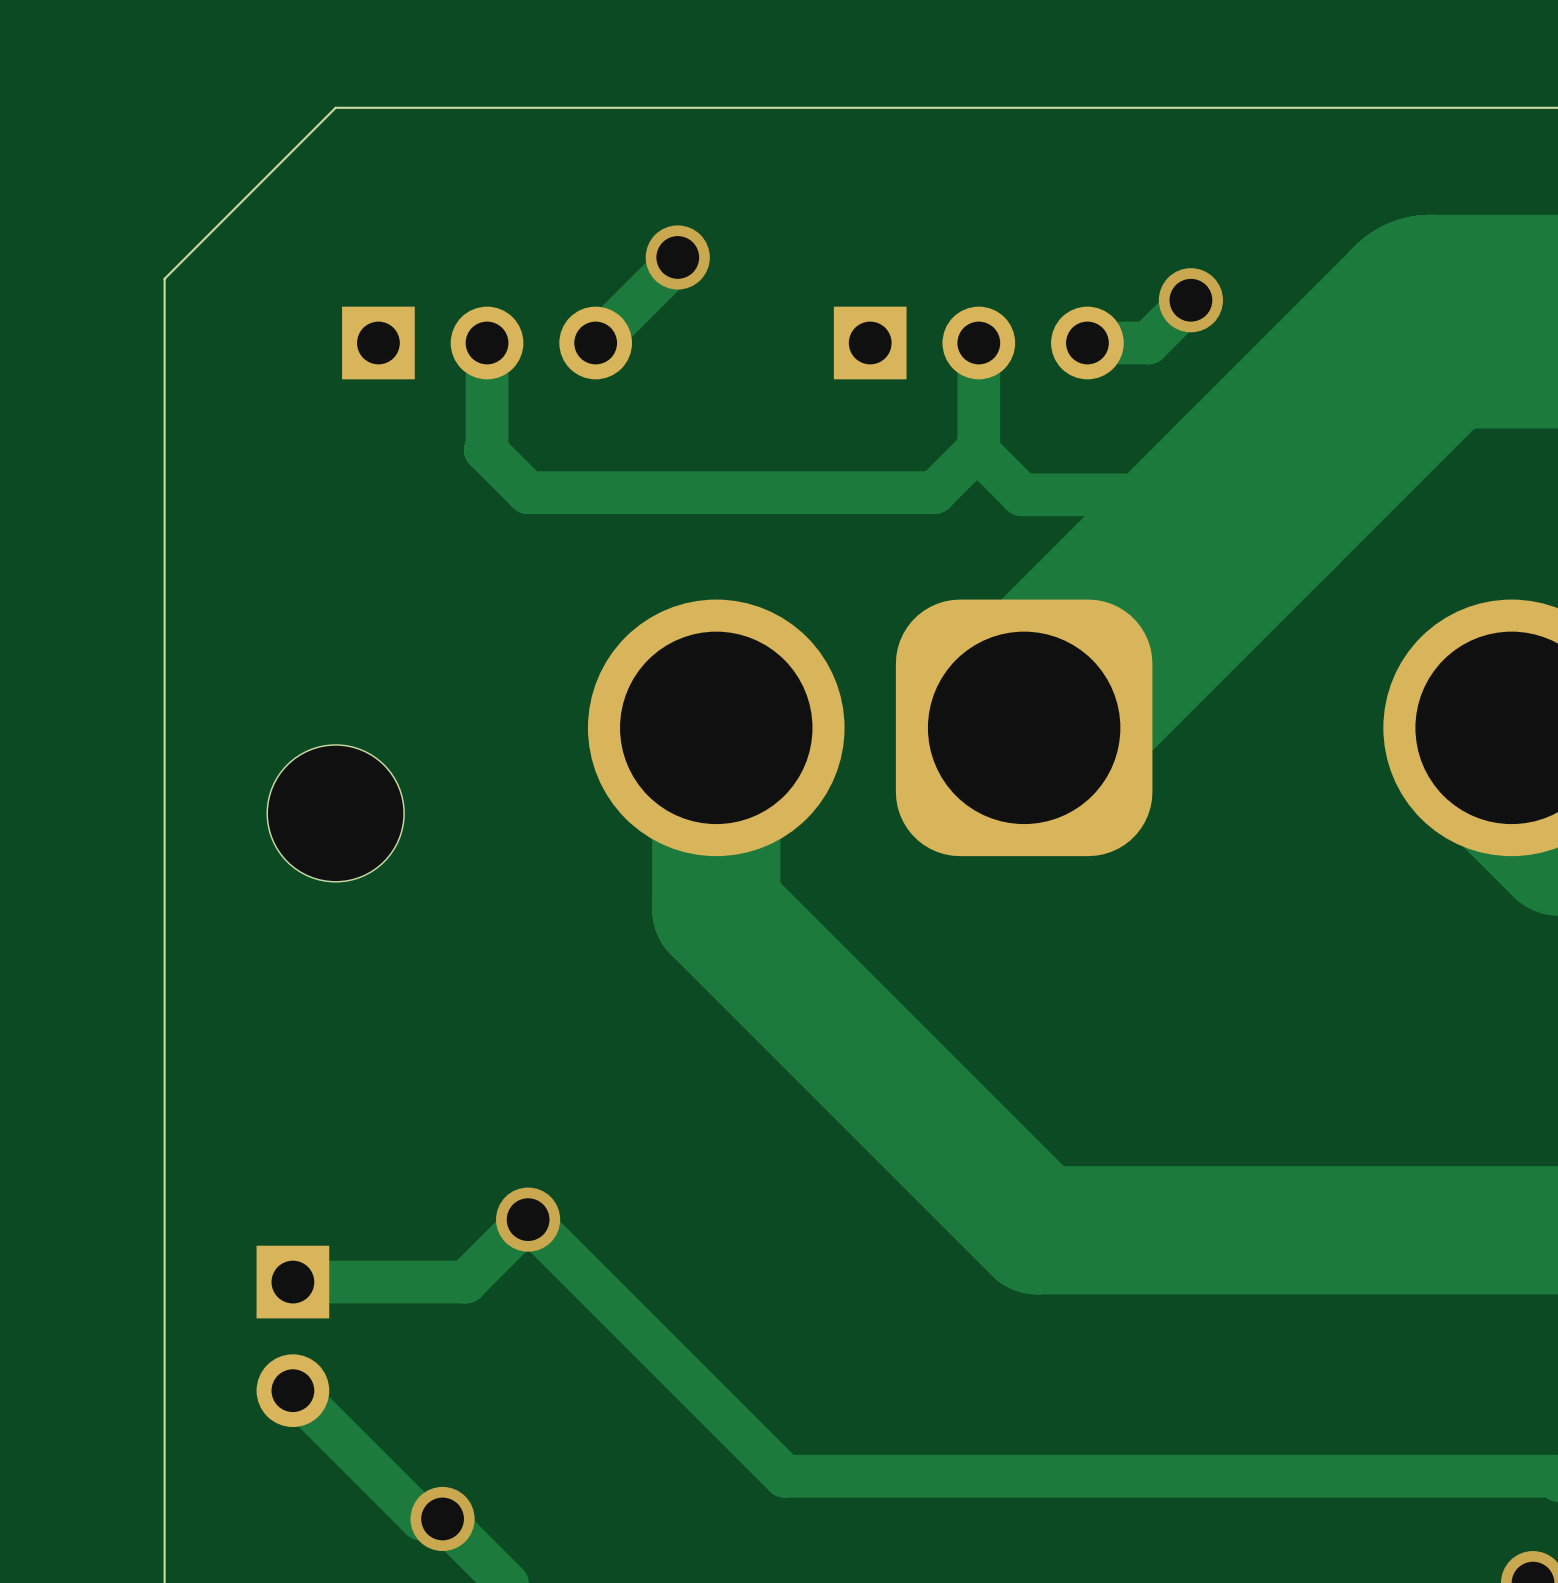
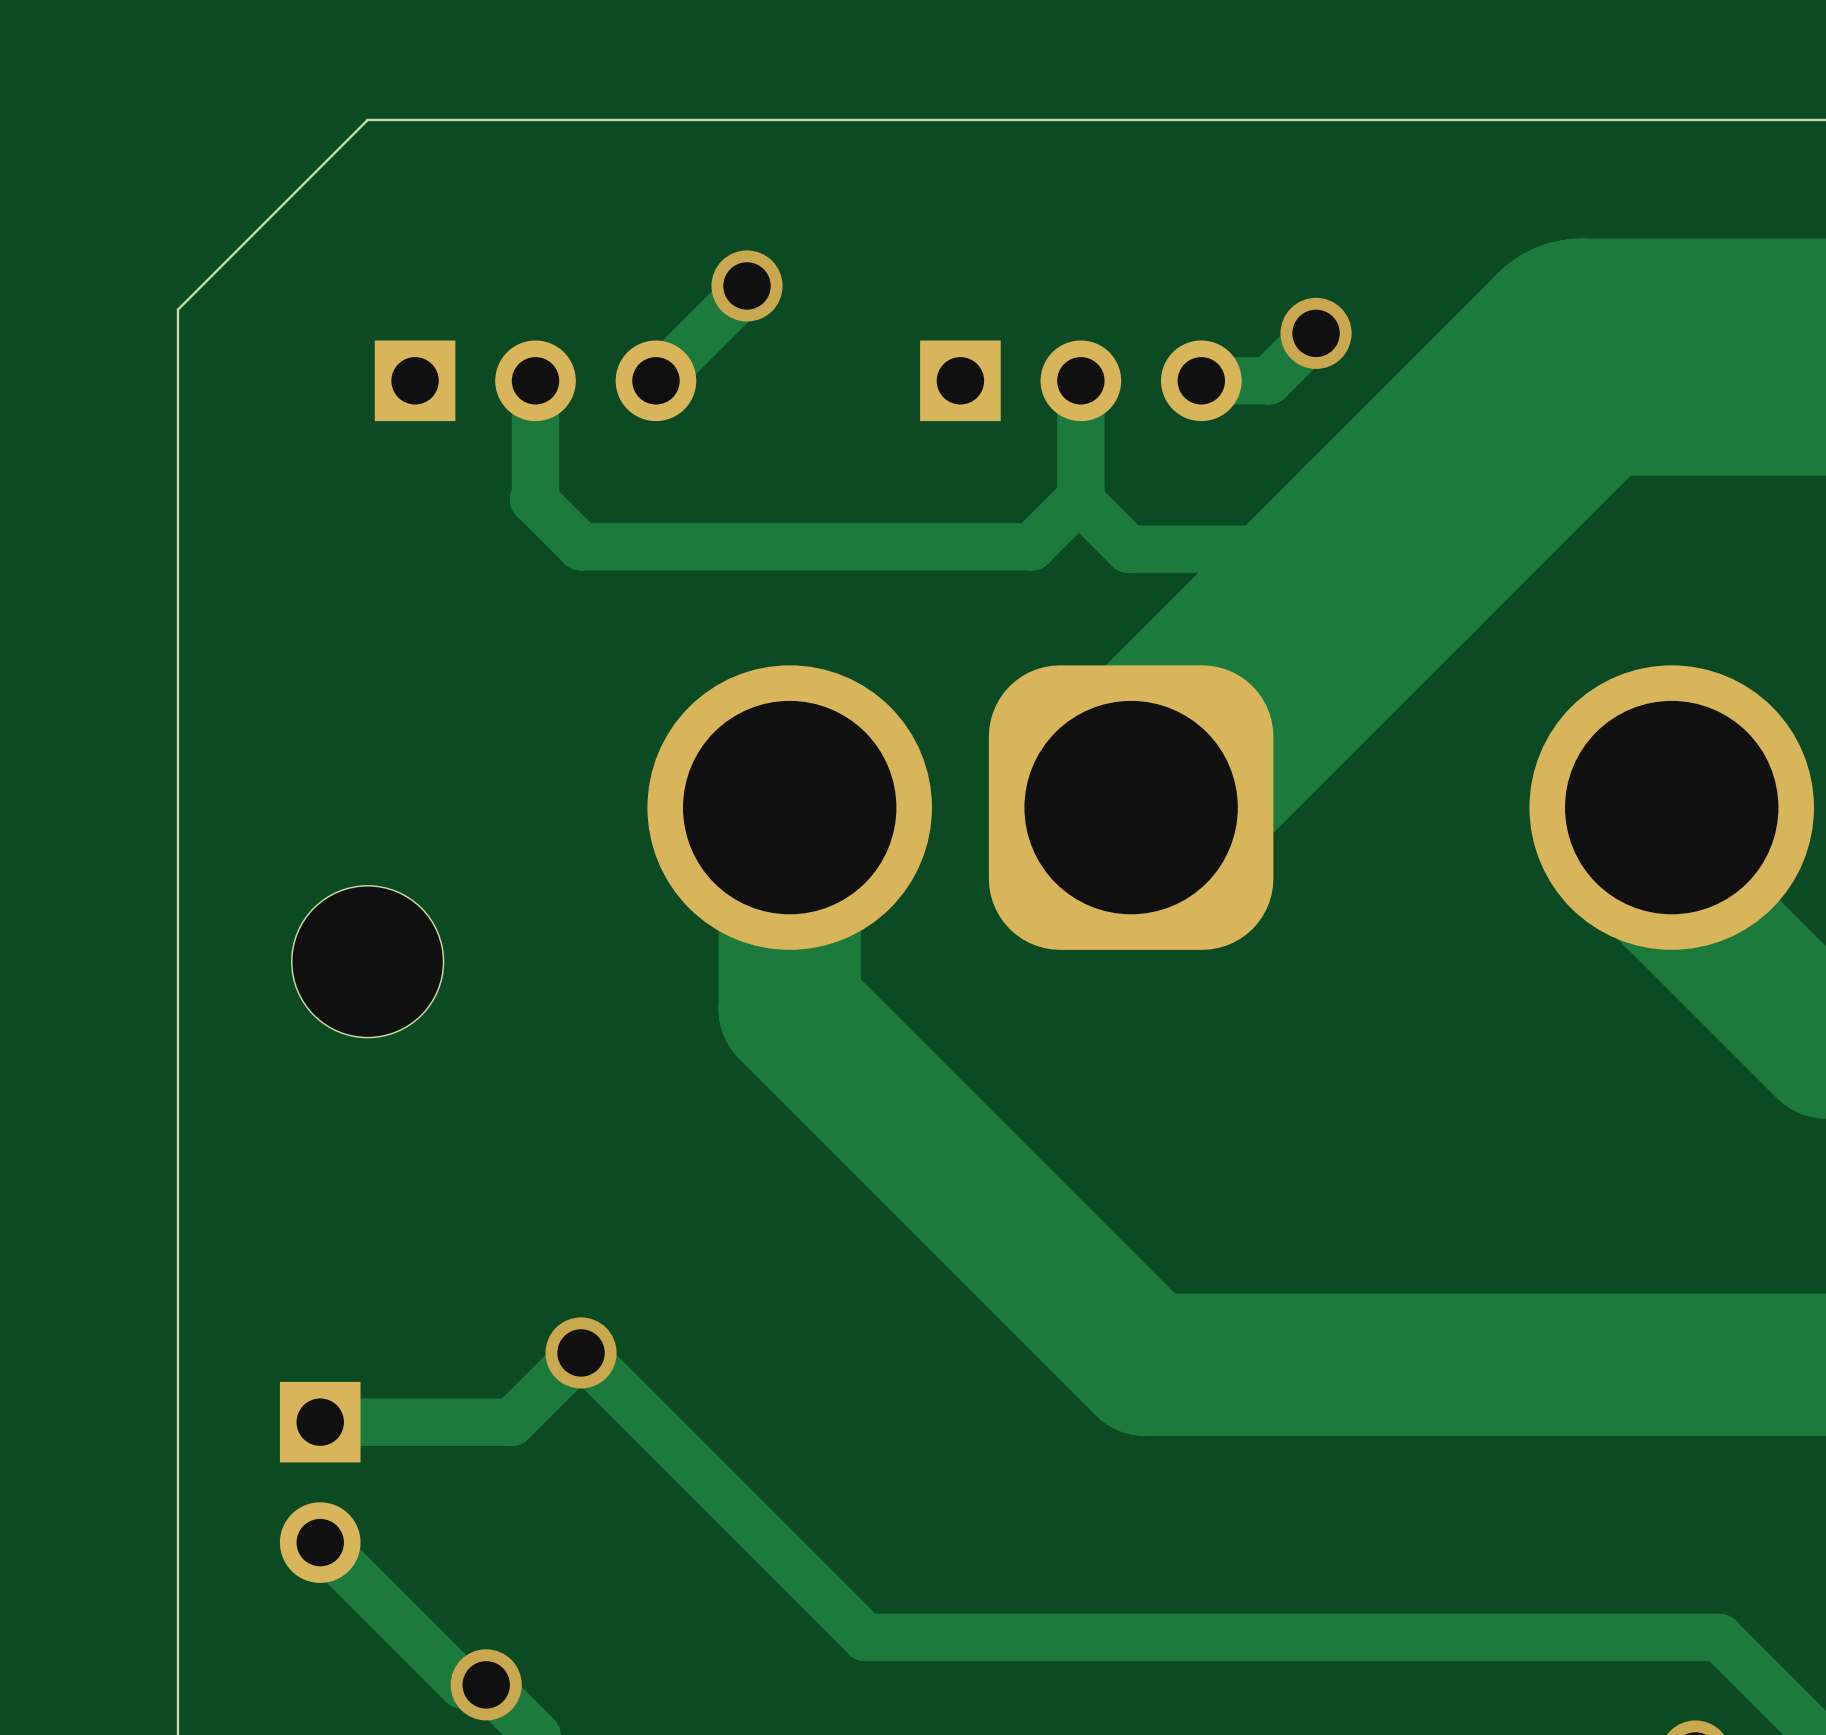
part position: (335, 813) -> (367, 961)

